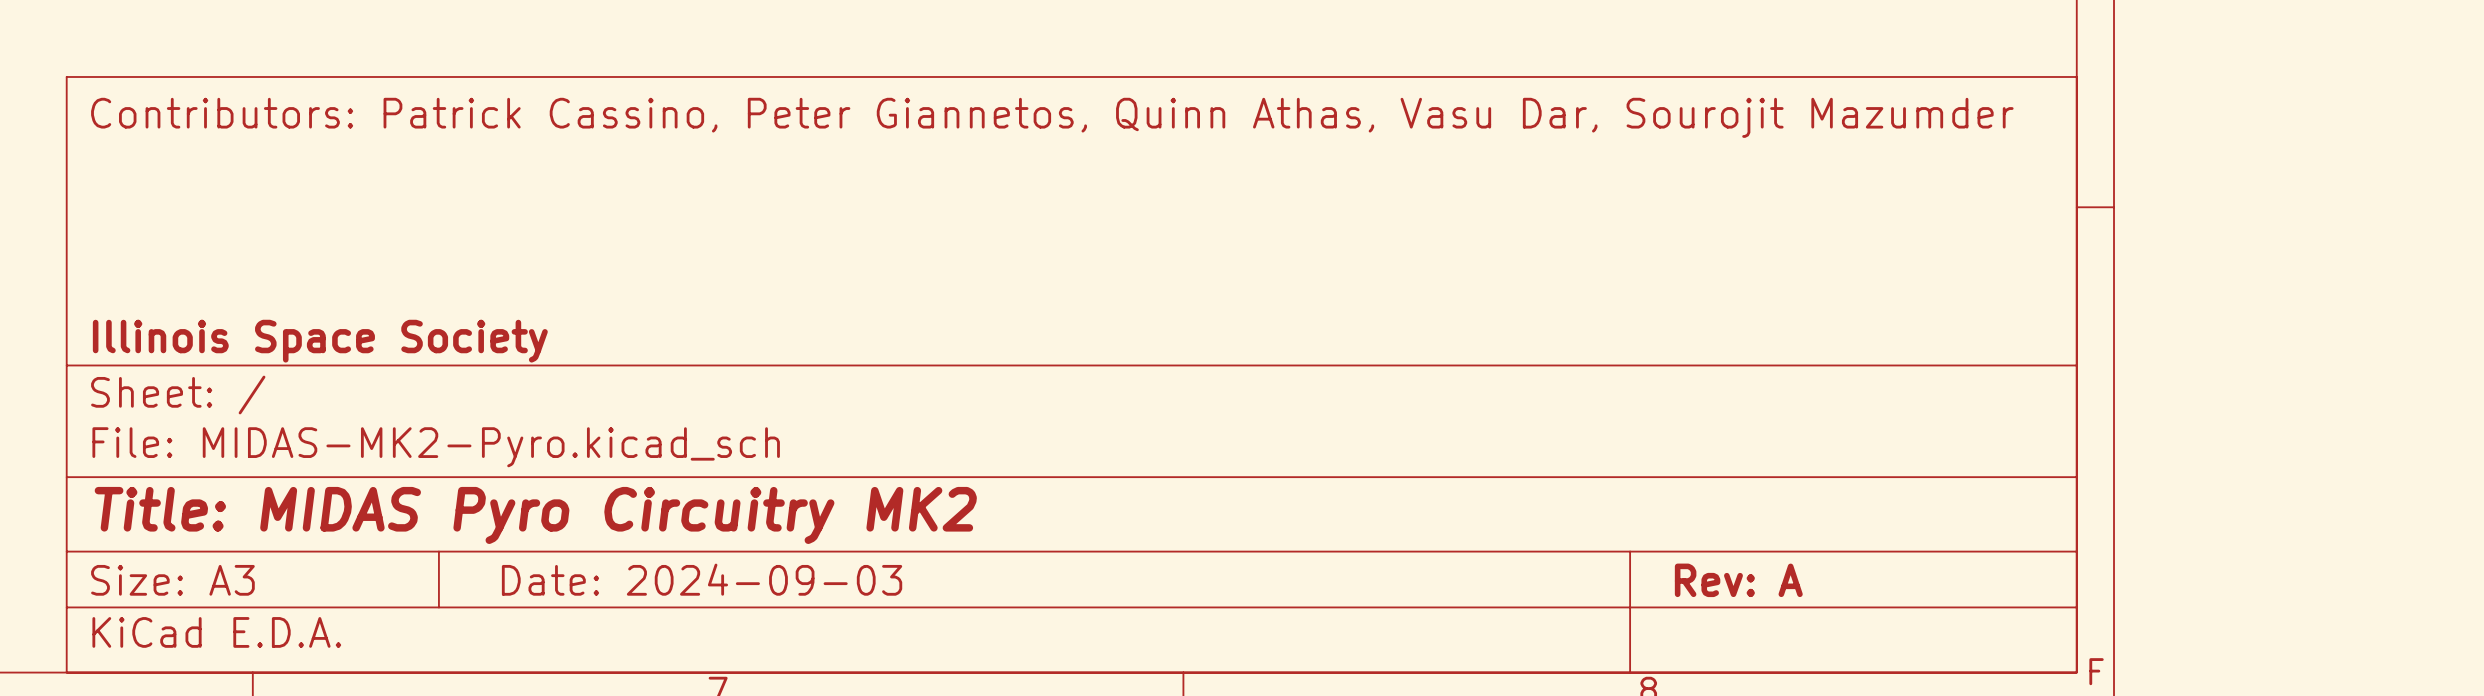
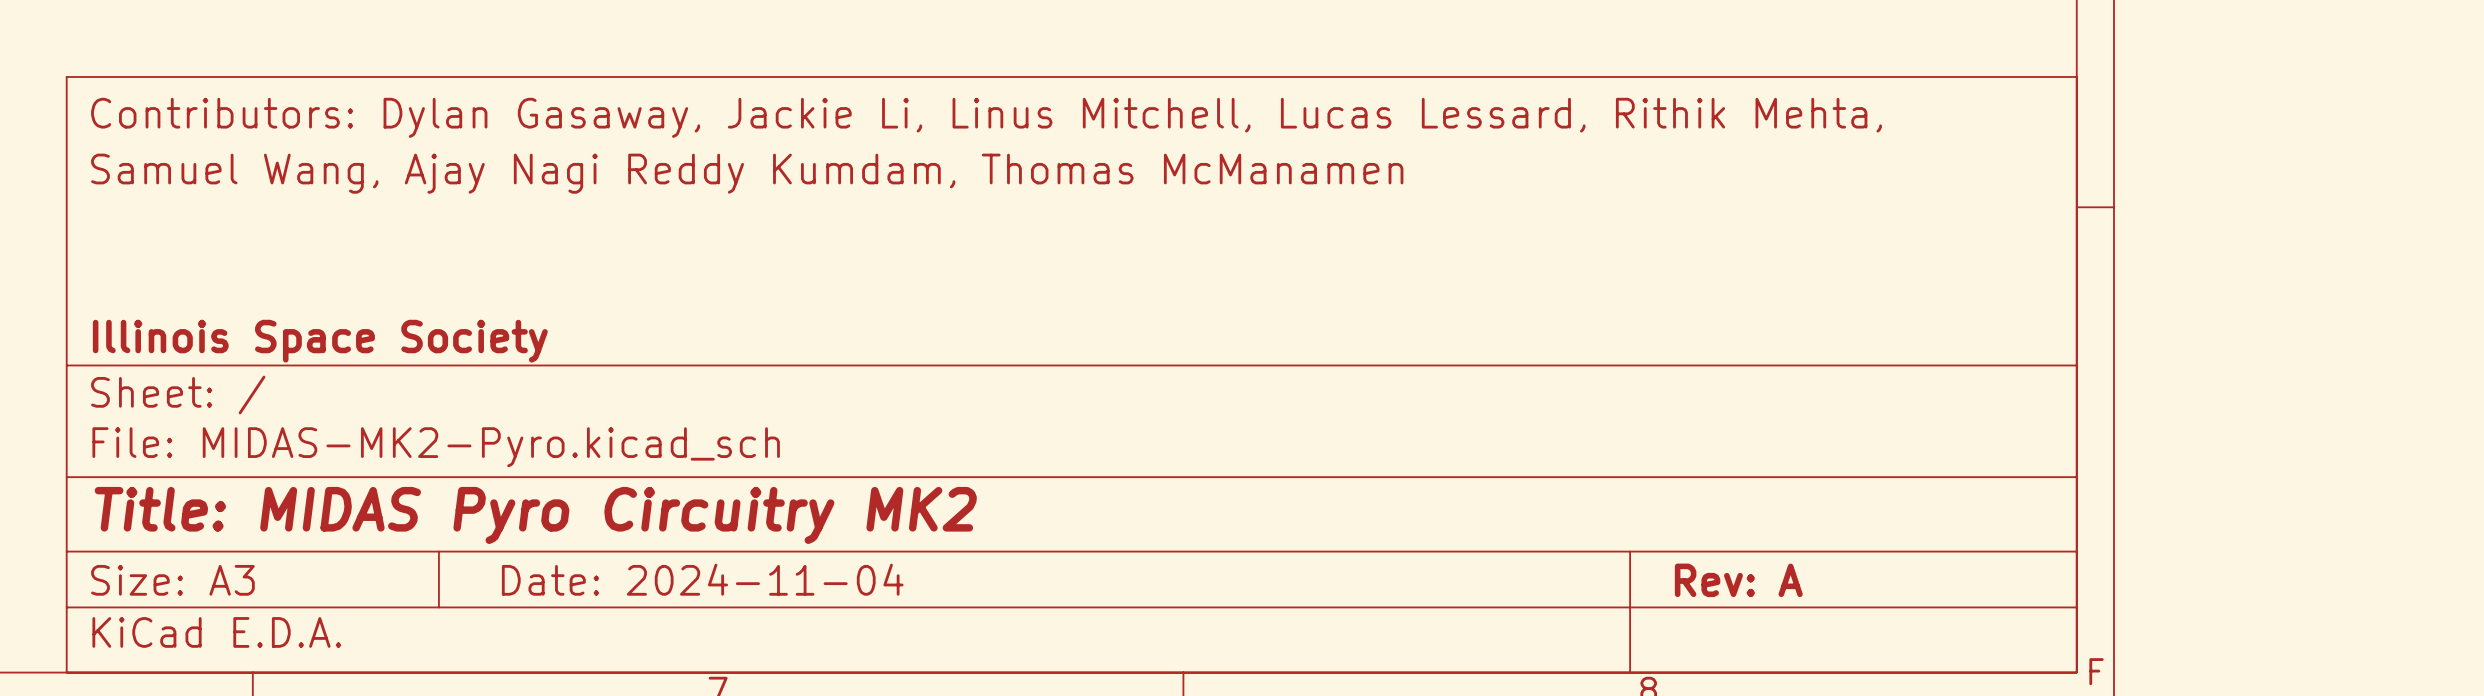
title block: Contributors: Patrick Cassino, Peter Giannetos, Quinn Athas, Vasu Dar, Sourojit Mazumder (1052, 117) -> Contributors: Dylan Gasaway, Jackie Li, Linus Mitchell, Lucas Lessard, Rithik Mehta, (986, 117)
title block: none -> Samuel Wang, Ajay Nagi Reddy Kumdam, Thomas McManamen (747, 173)
title block: Date: 2024-09-03 (702, 579) -> Date: 2024-11-04 (702, 579)

